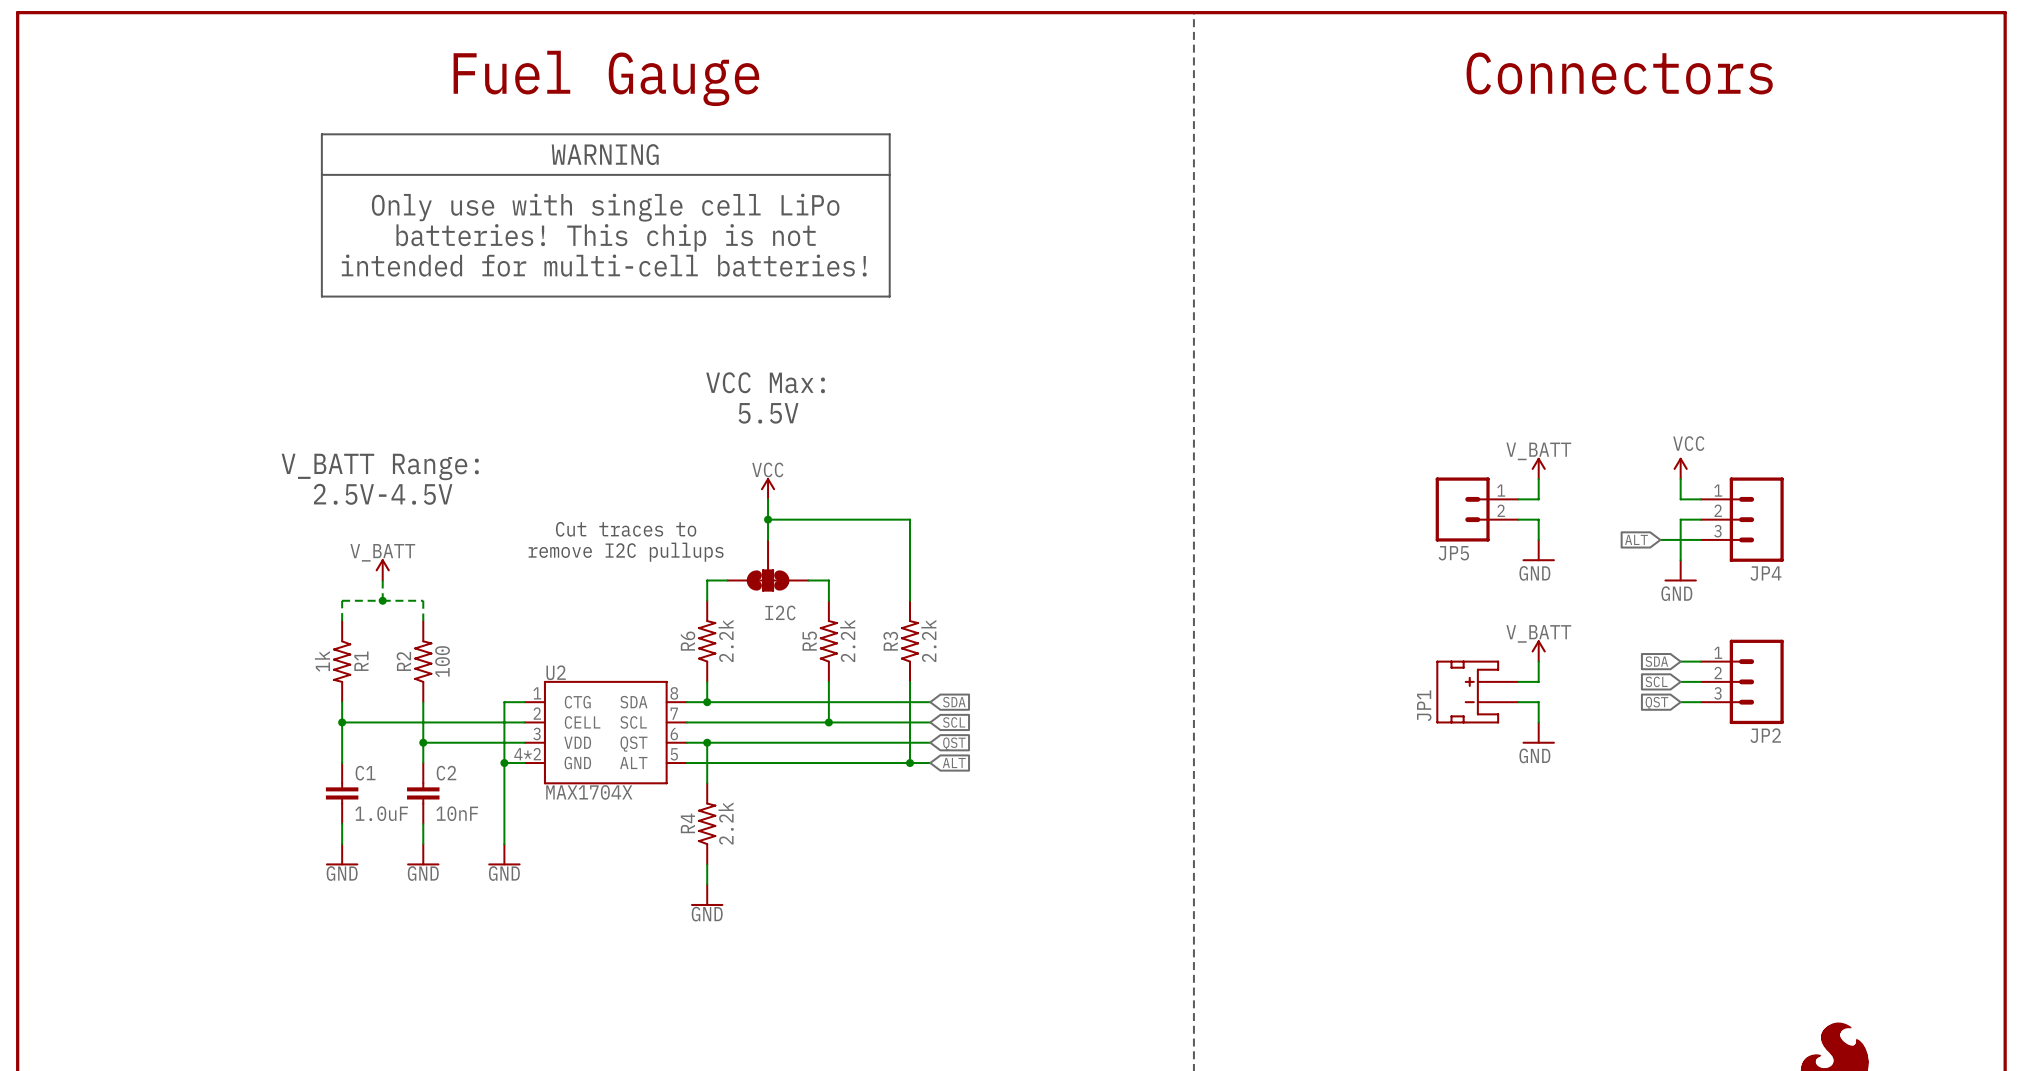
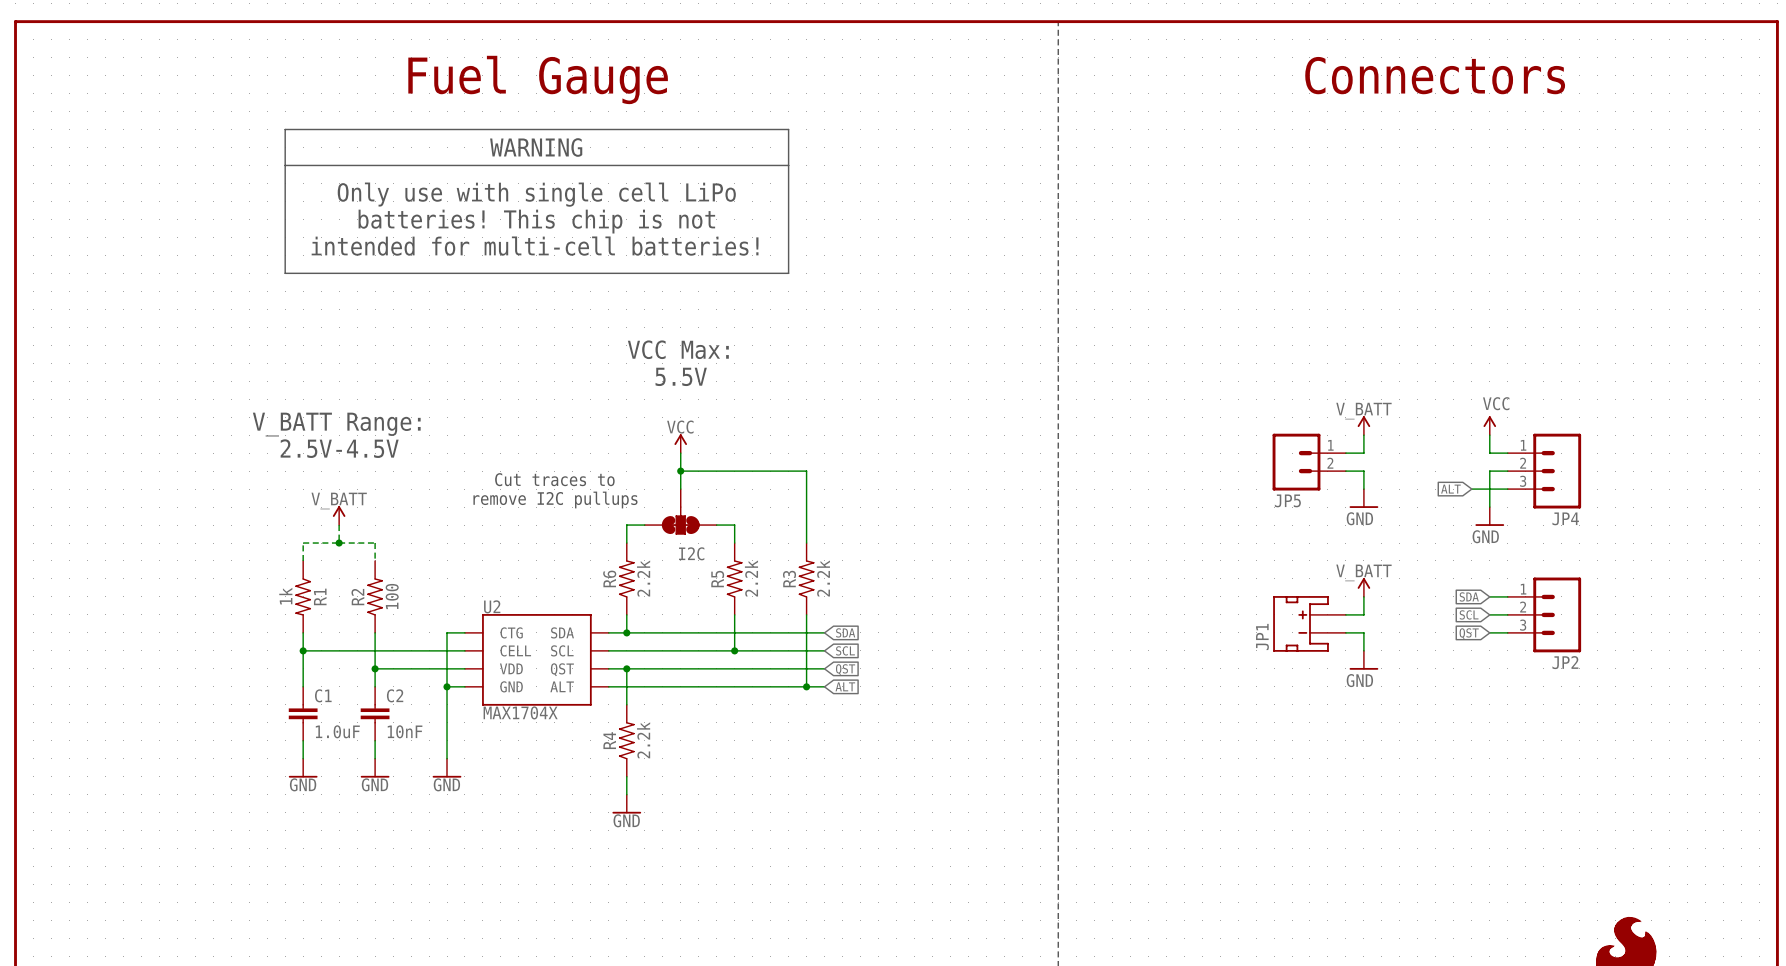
U2 pin number: 1 (537, 693) -> none
U2 pin number: 8 (674, 693) -> none
U2 pin number: 2 (537, 713) -> none
U2 pin number: 7 (674, 713) -> none
U2 pin number: 3 (537, 733) -> none
U2 pin number: 6 (674, 734) -> none
U2 pin number: 4*2 (527, 754) -> none
U2 pin number: 5 (674, 754) -> none

